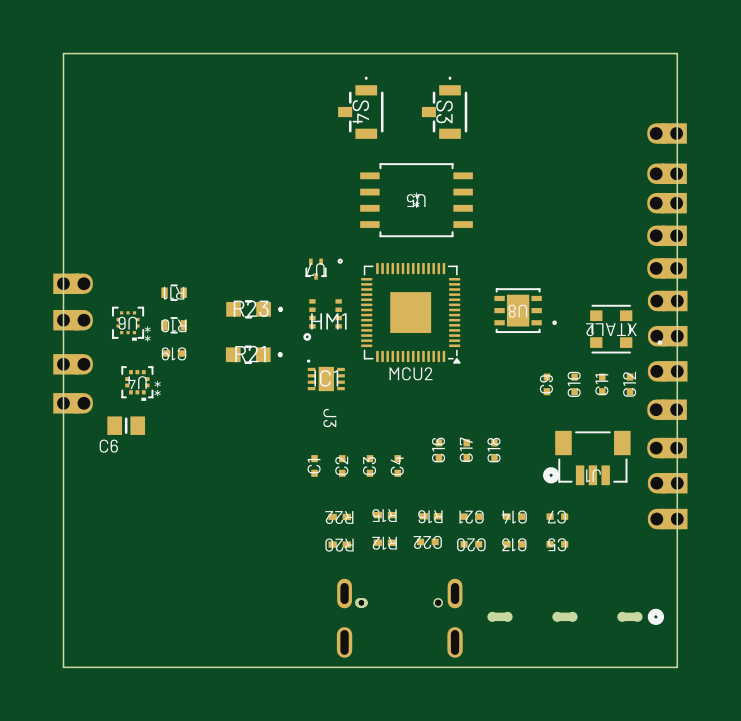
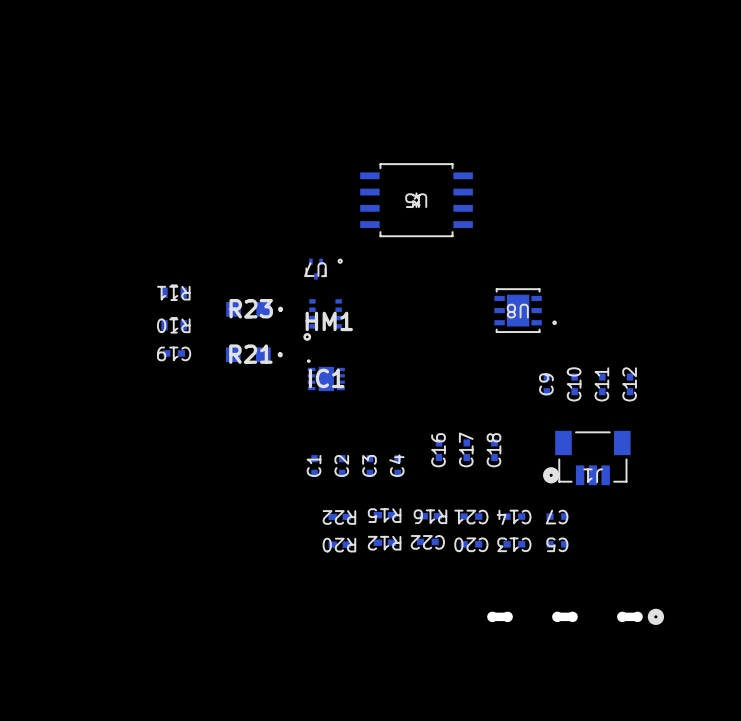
board edge: (677, 53) (63, 53) (63, 667) (677, 667) (677, 53) -> none
S4: (360, 107) -> none
S3: (444, 107) -> none
part: (667, 133) -> none
part: (667, 173) -> none
part: (667, 203) -> none
part: (667, 235) -> none
part: (667, 268) -> none
part: (73, 283) -> none
part: (667, 301) -> none
MCU2: (410, 313) -> none
part: (73, 320) -> none
U6: (128, 323) -> none
XTAL2: (626, 329) -> none
part: (667, 336) -> none
part: (73, 364) -> none
part: (667, 371) -> none
U4: (137, 383) -> none
part: (73, 403) -> none
part: (667, 409) -> none
C6: (126, 425) -> none
part: (667, 448) -> none
part: (667, 483) -> none
part: (667, 519) -> none
J3: (399, 618) -> none

